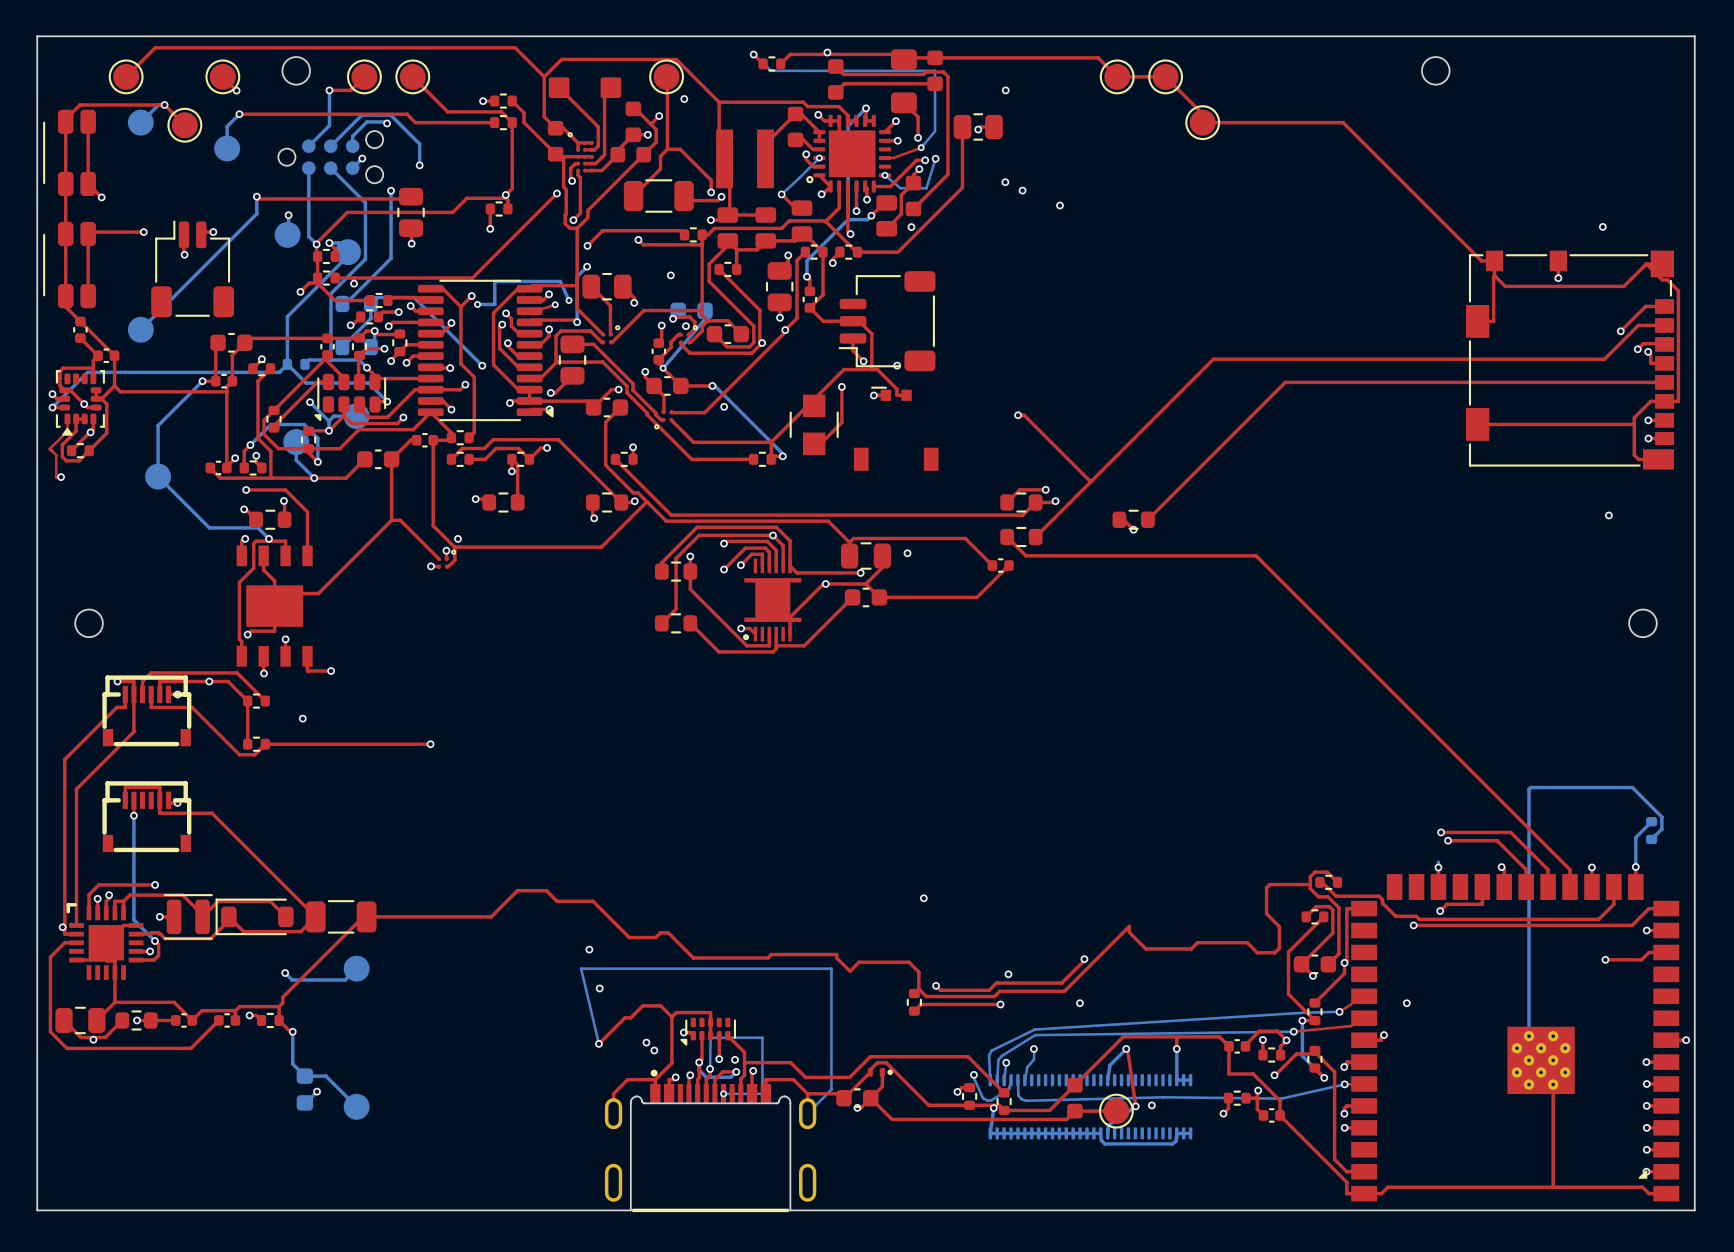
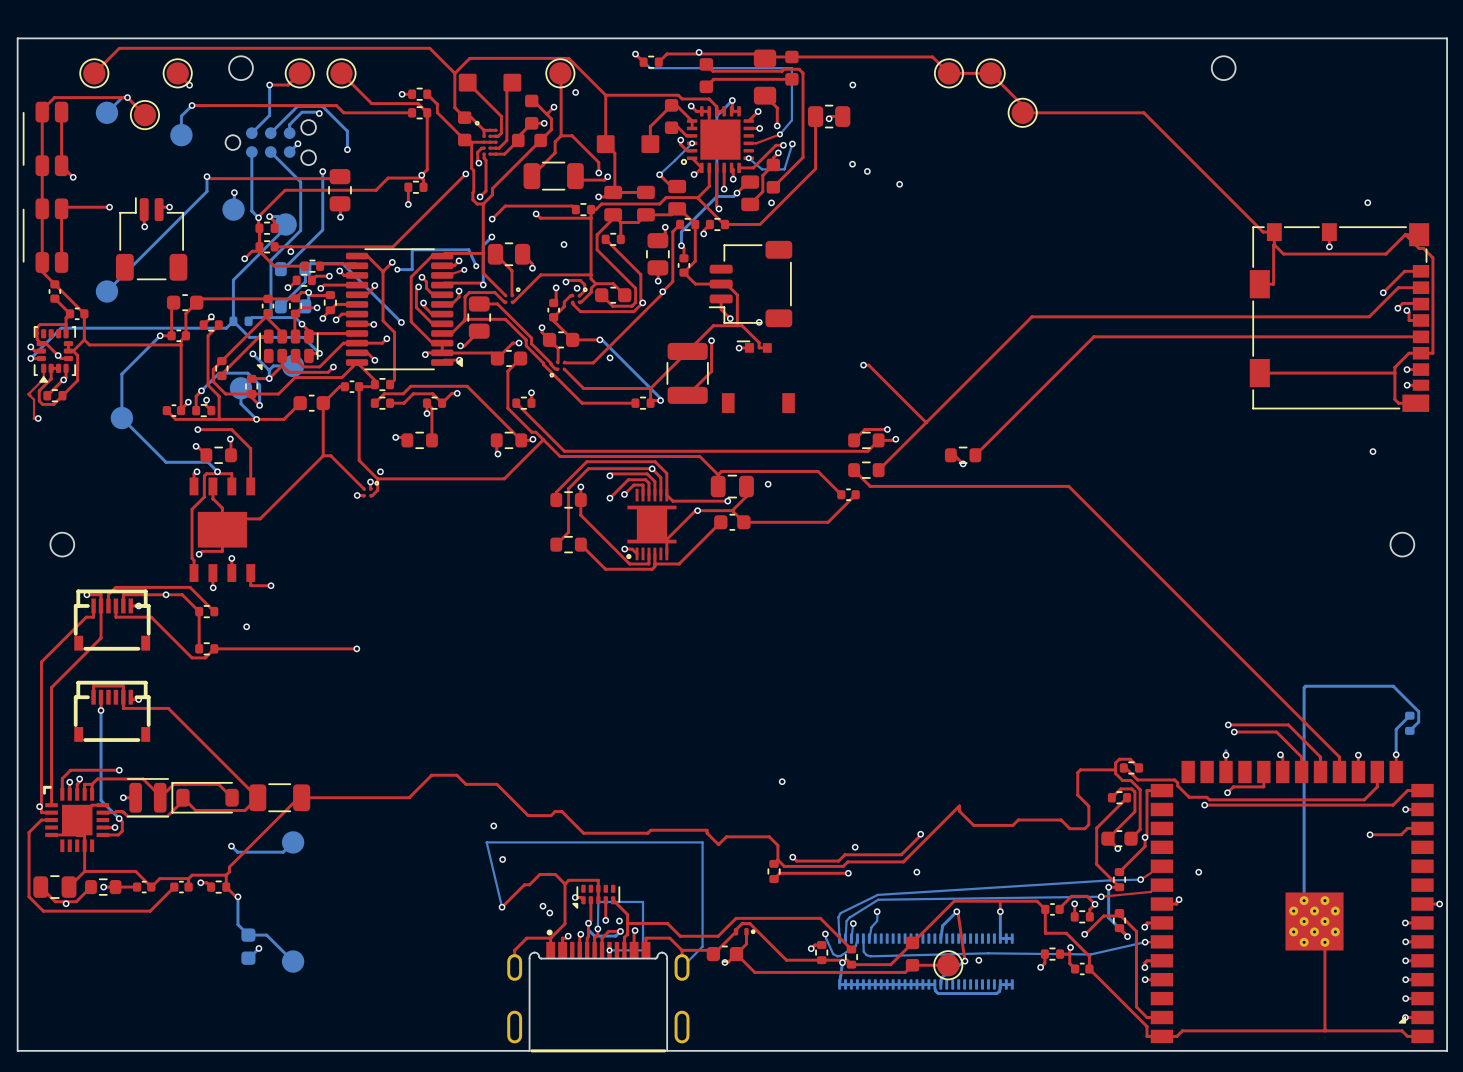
part footprint: [716, 129, 774, 189] -> [596, 135, 660, 154]
part: (691, 310) -> none
bottom track: (704, 310) (704, 319) (663, 368) -> none
via: (663, 368) -> none
part footprint: [789, 394, 839, 456] -> [666, 342, 709, 404]

